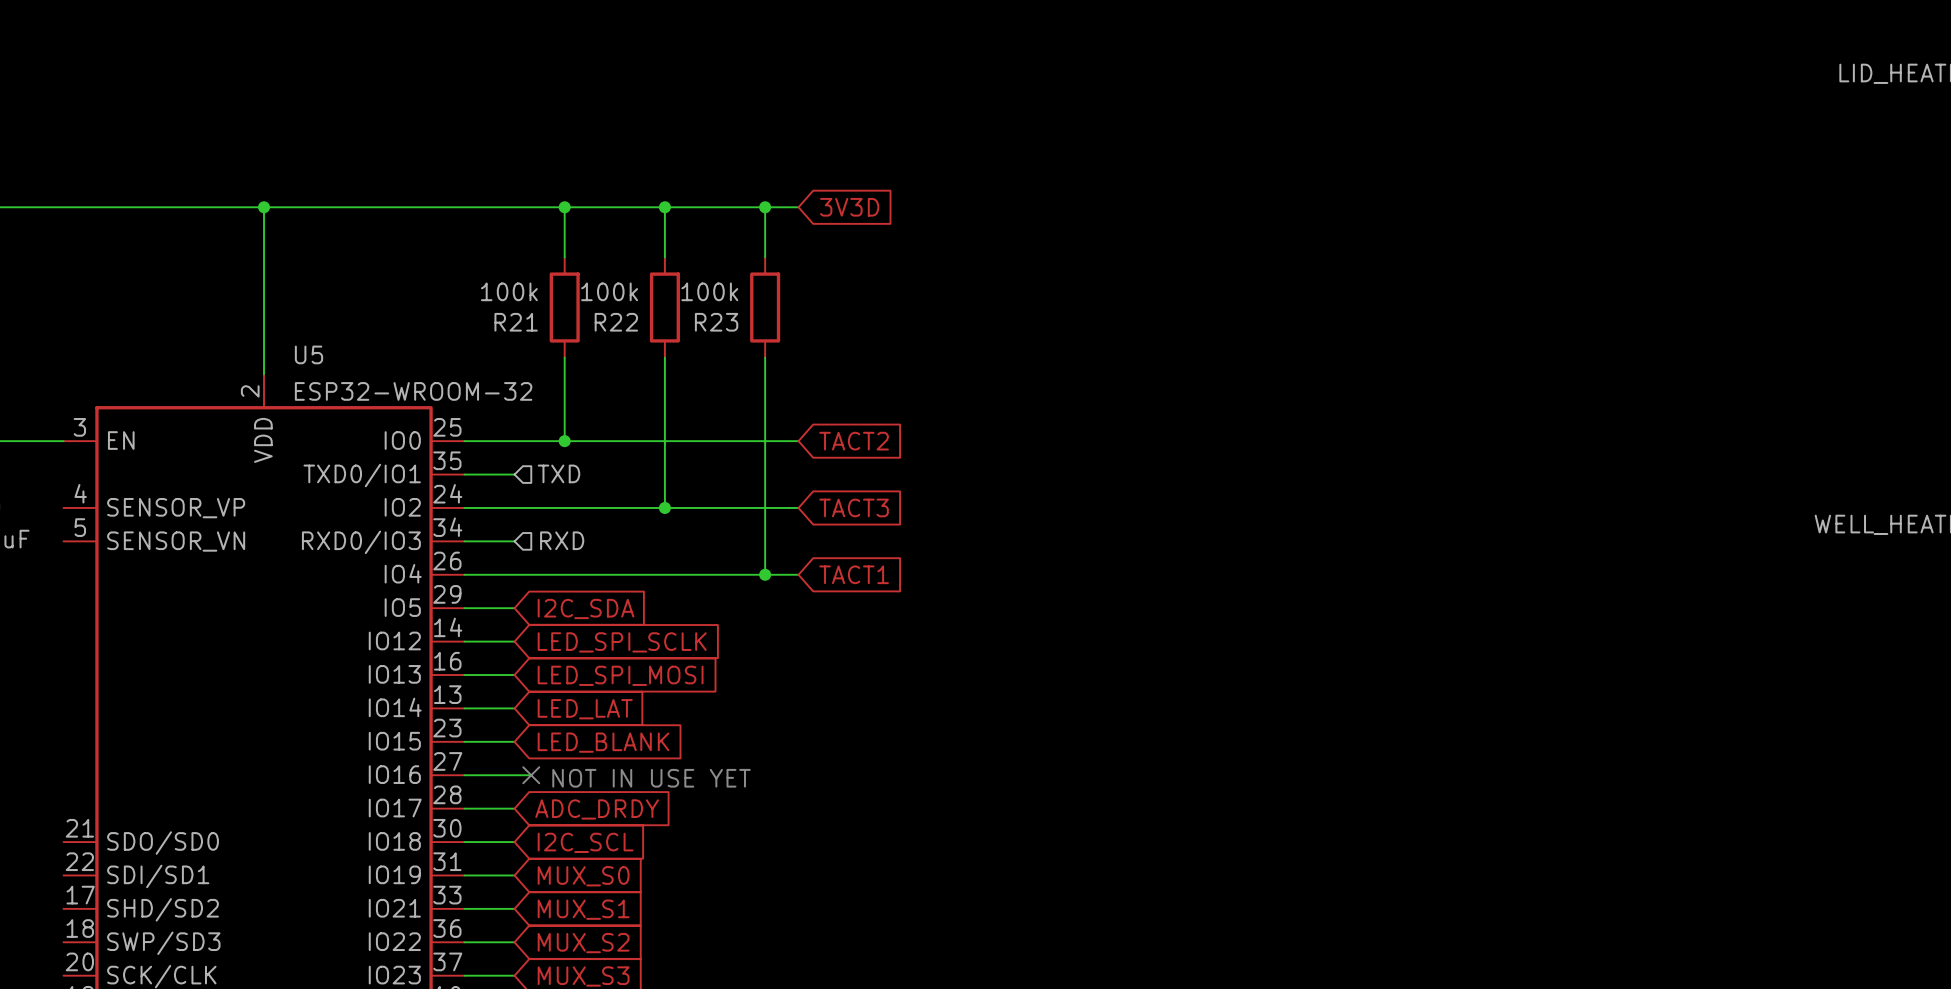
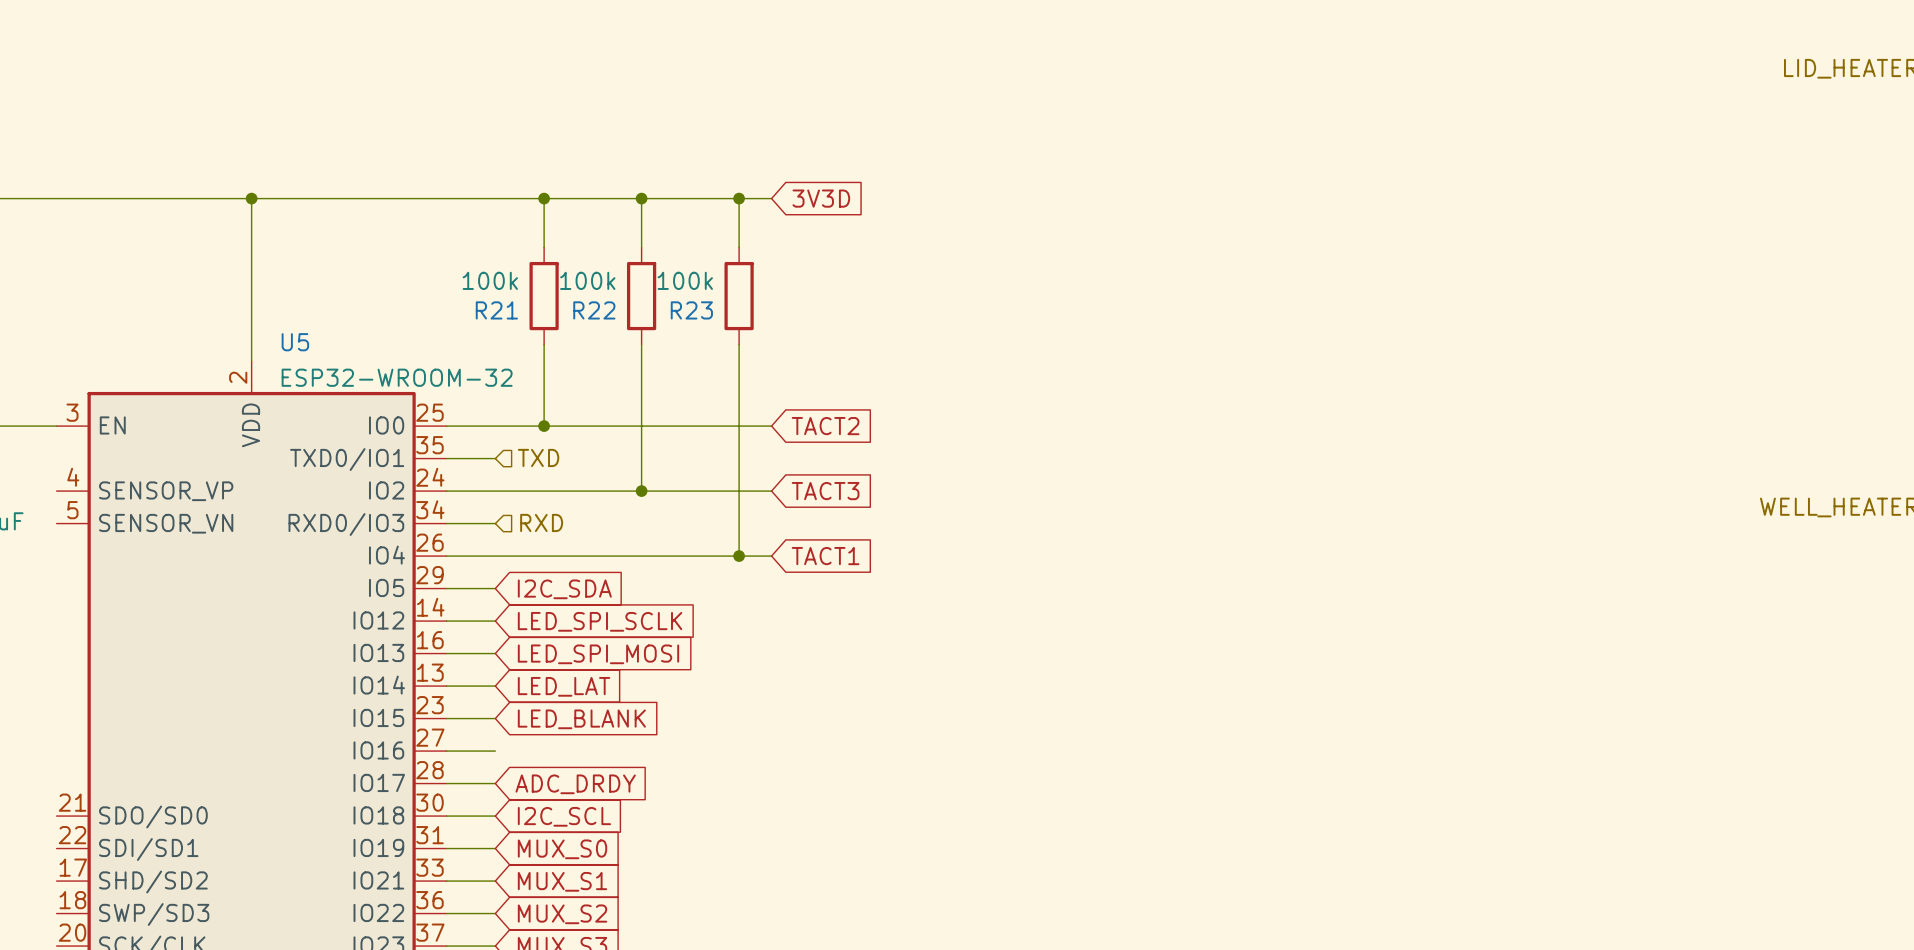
wire: (514, 775) (531, 775) -> none
no-connect mark: (531, 775) -> none
text: NOT IN USE YET (651, 778) -> none

